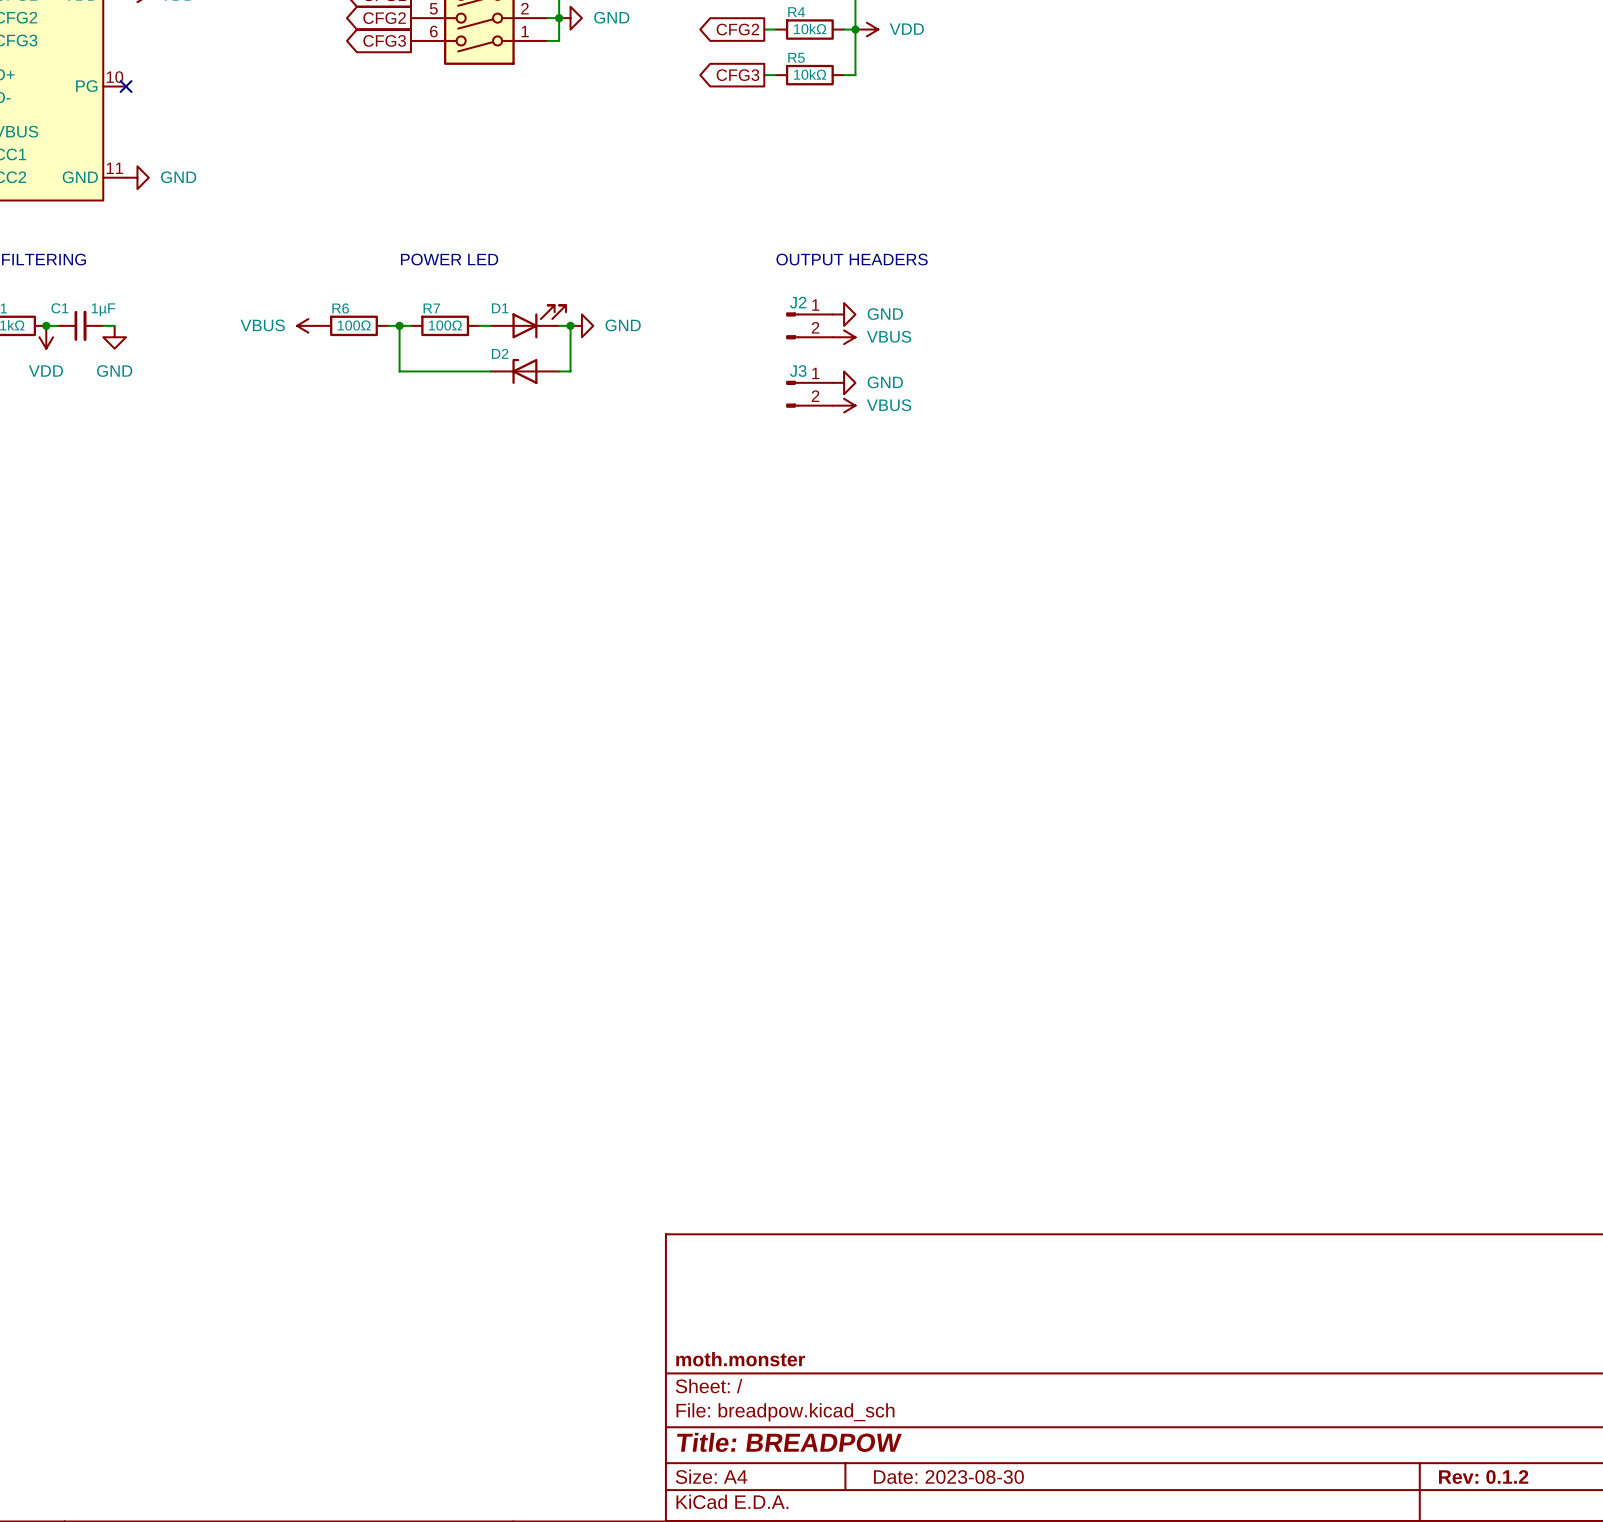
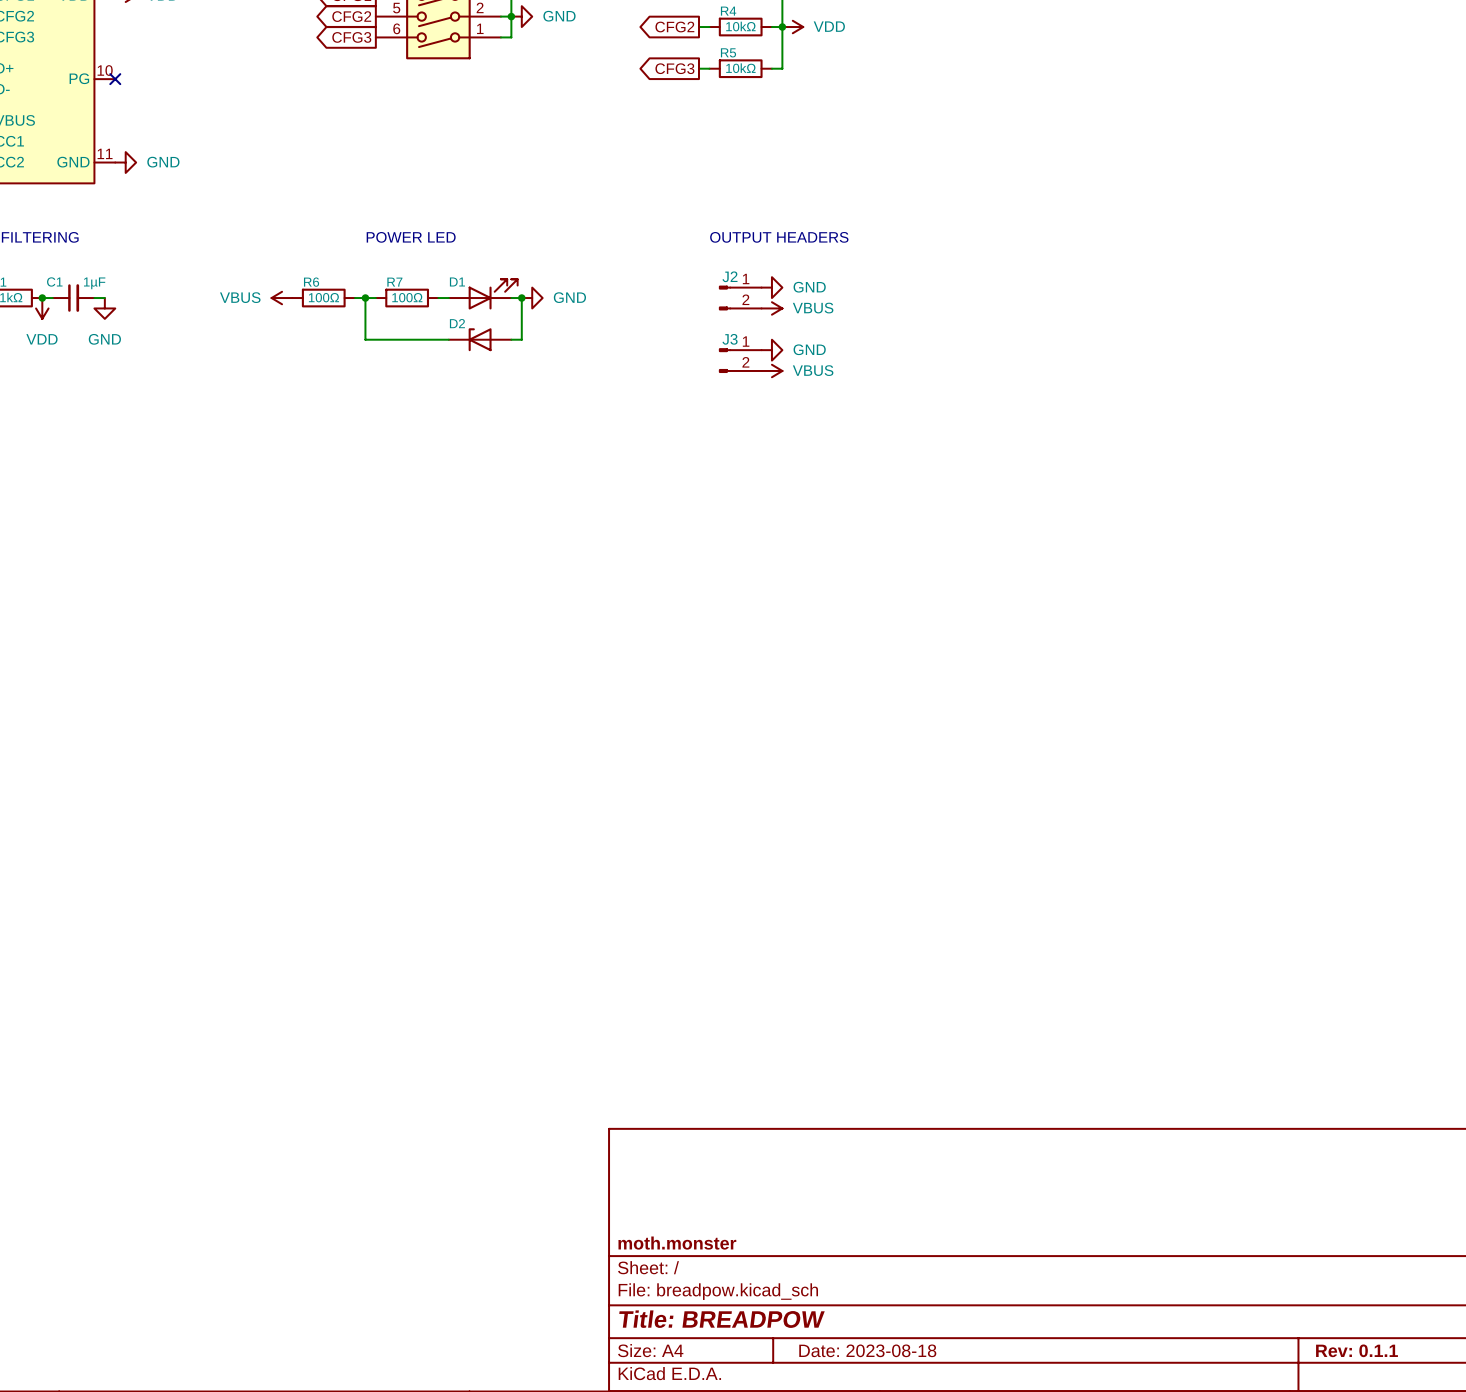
title block: Date: 2023-08-30 (948, 1477) -> Date: 2023-08-18 (867, 1350)
title block: Rev: 0.1.2 (1483, 1477) -> Rev: 0.1.1 (1357, 1350)

